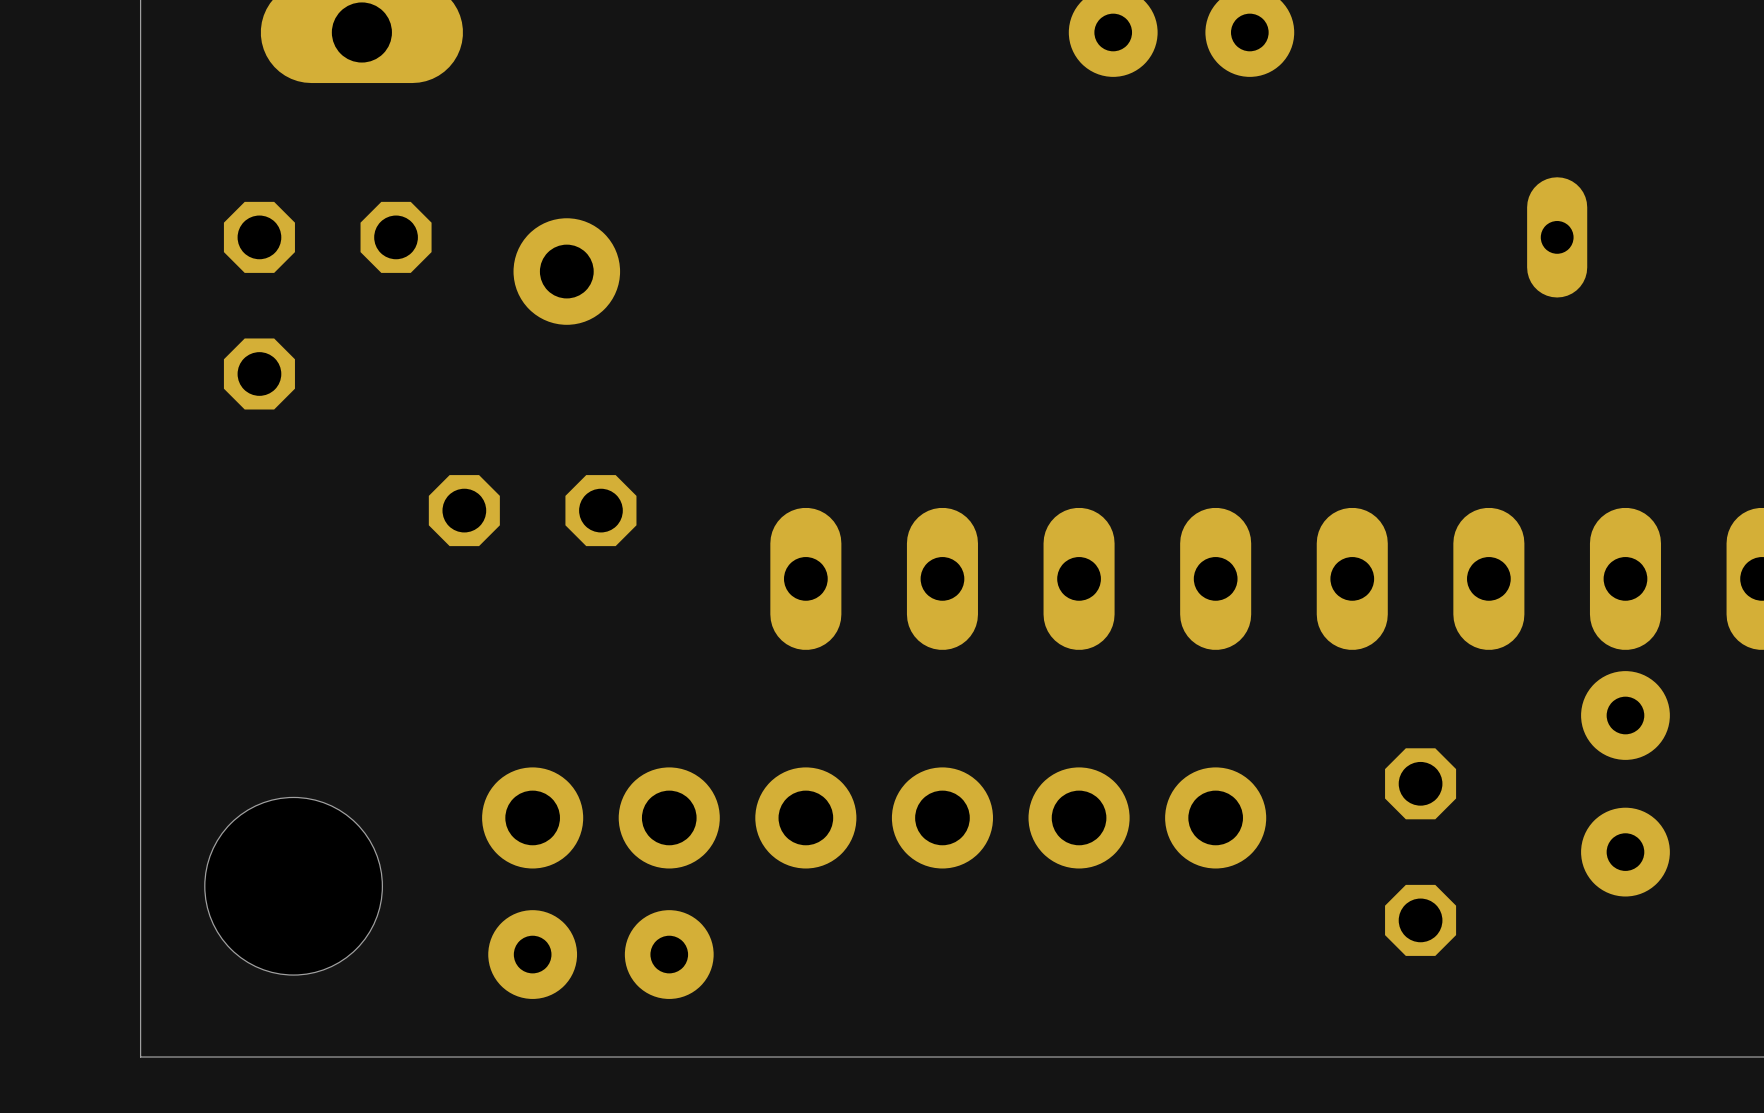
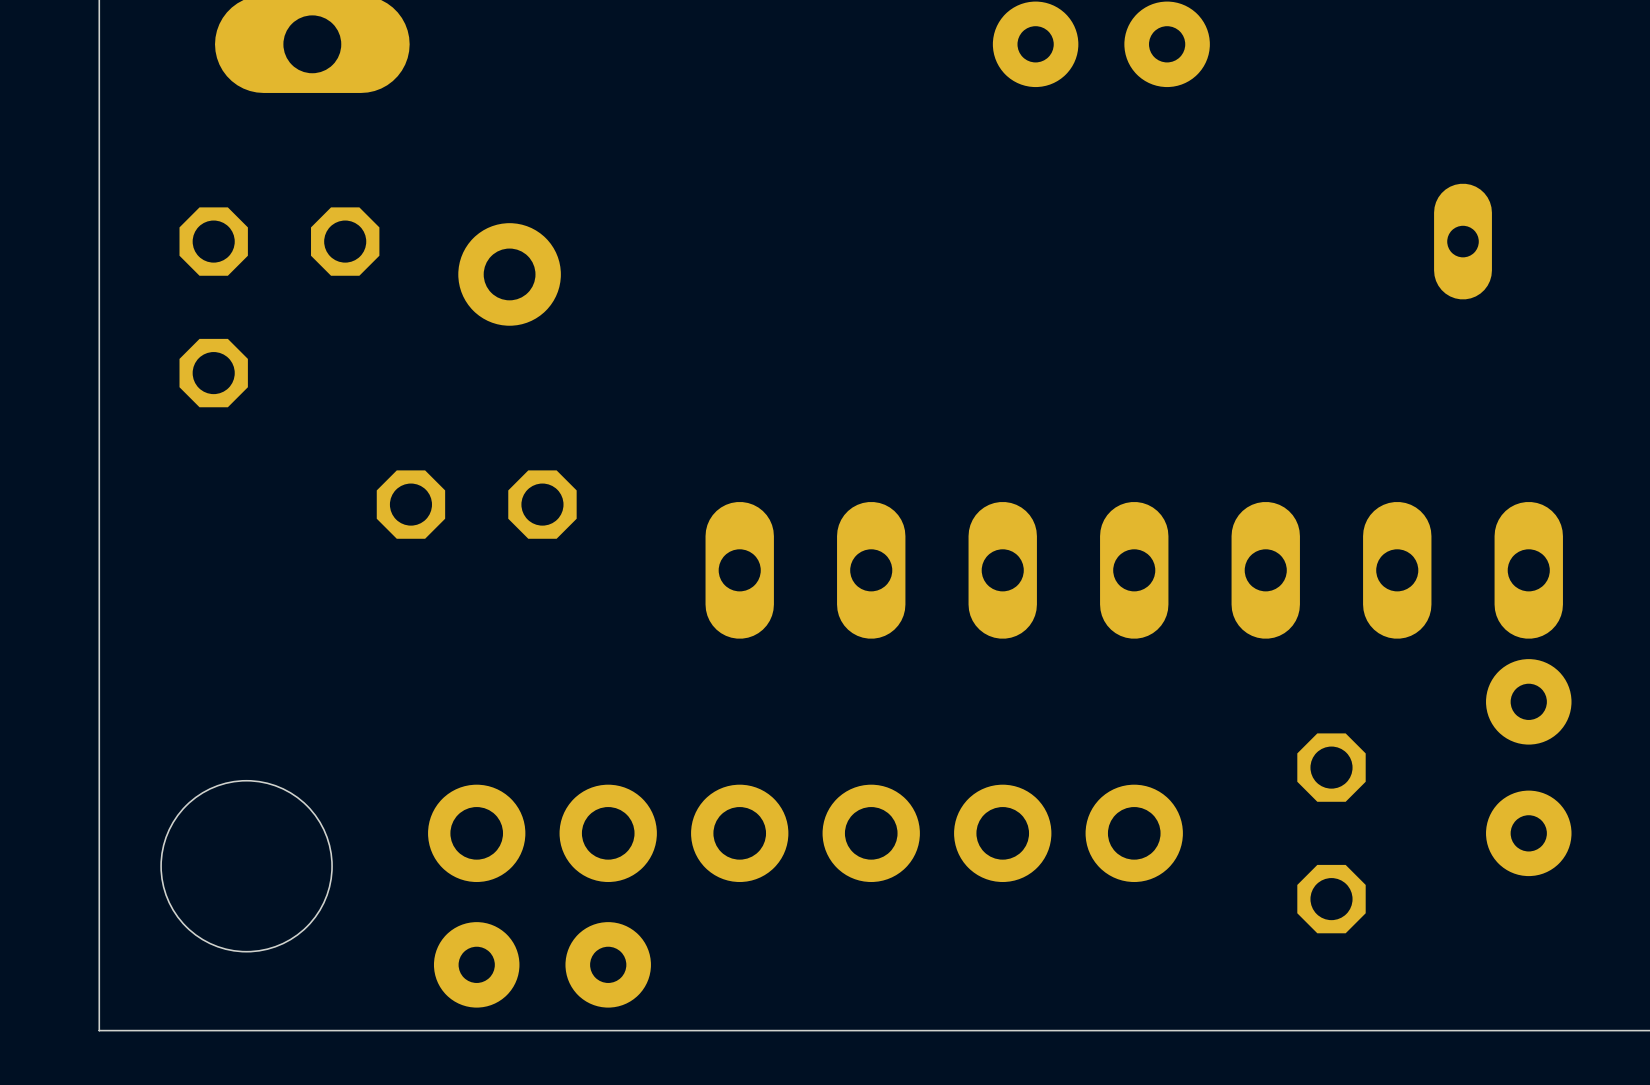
part position: (874, 817) -> (805, 833)
part position: (600, 954) -> (542, 964)

